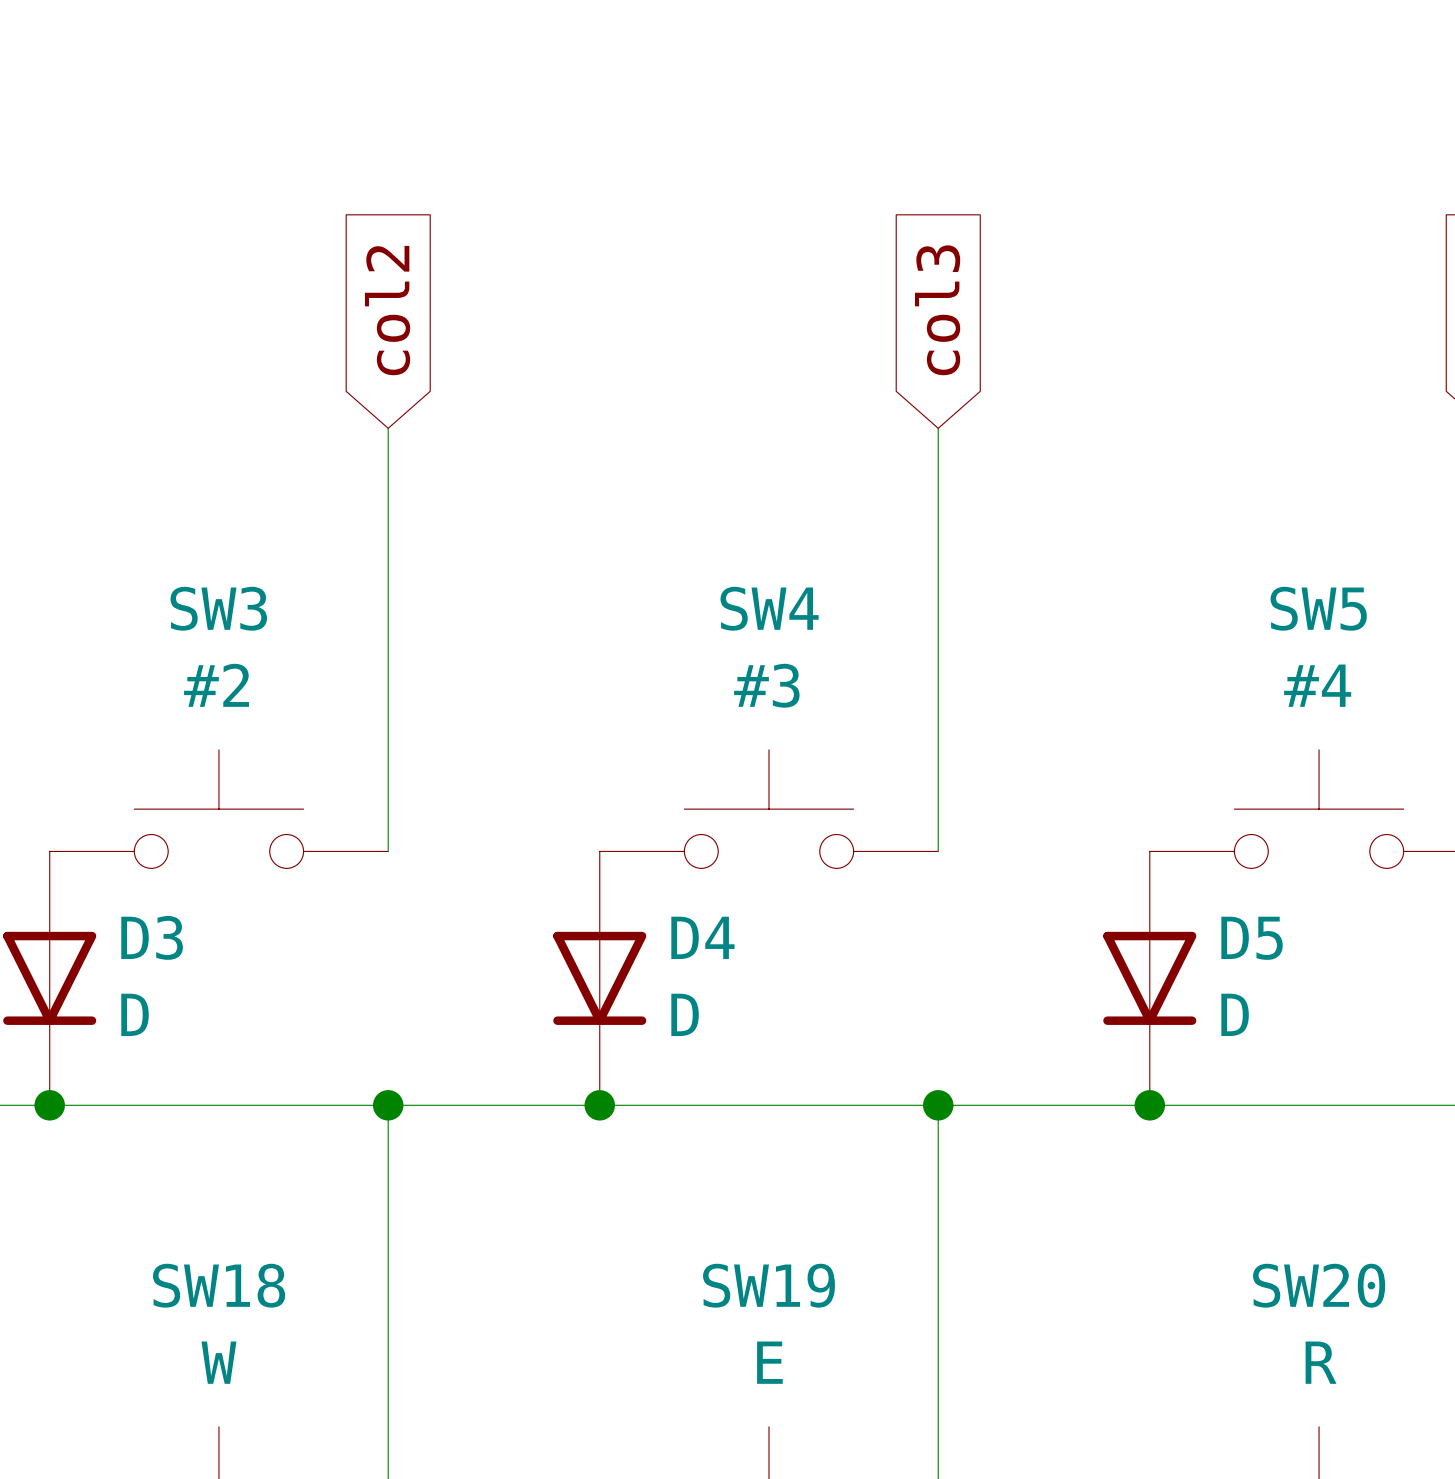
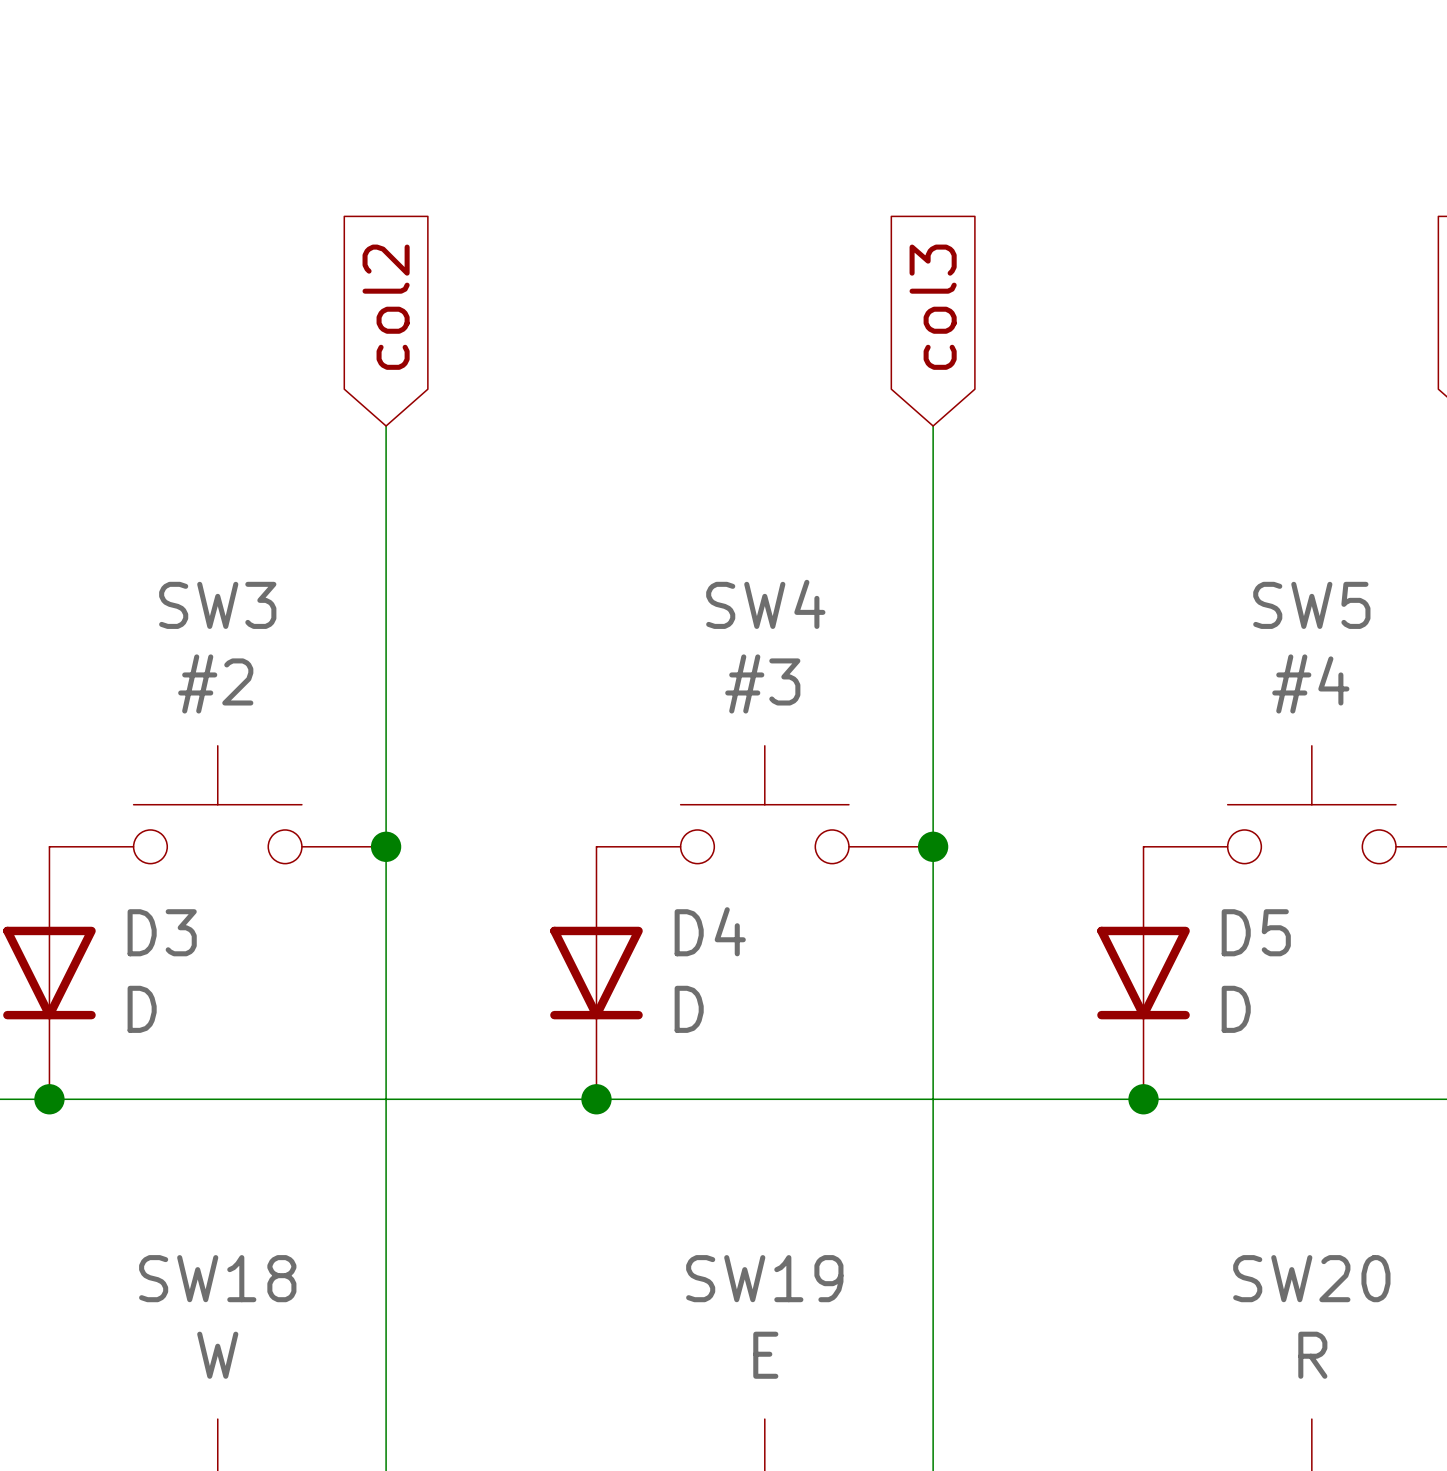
wire: none -> (386, 846) (386, 1099)
junction: none -> (386, 846)
wire: none -> (933, 846) (933, 1099)
junction: none -> (933, 846)
junction: (388, 1105) -> none
junction: (938, 1105) -> none

